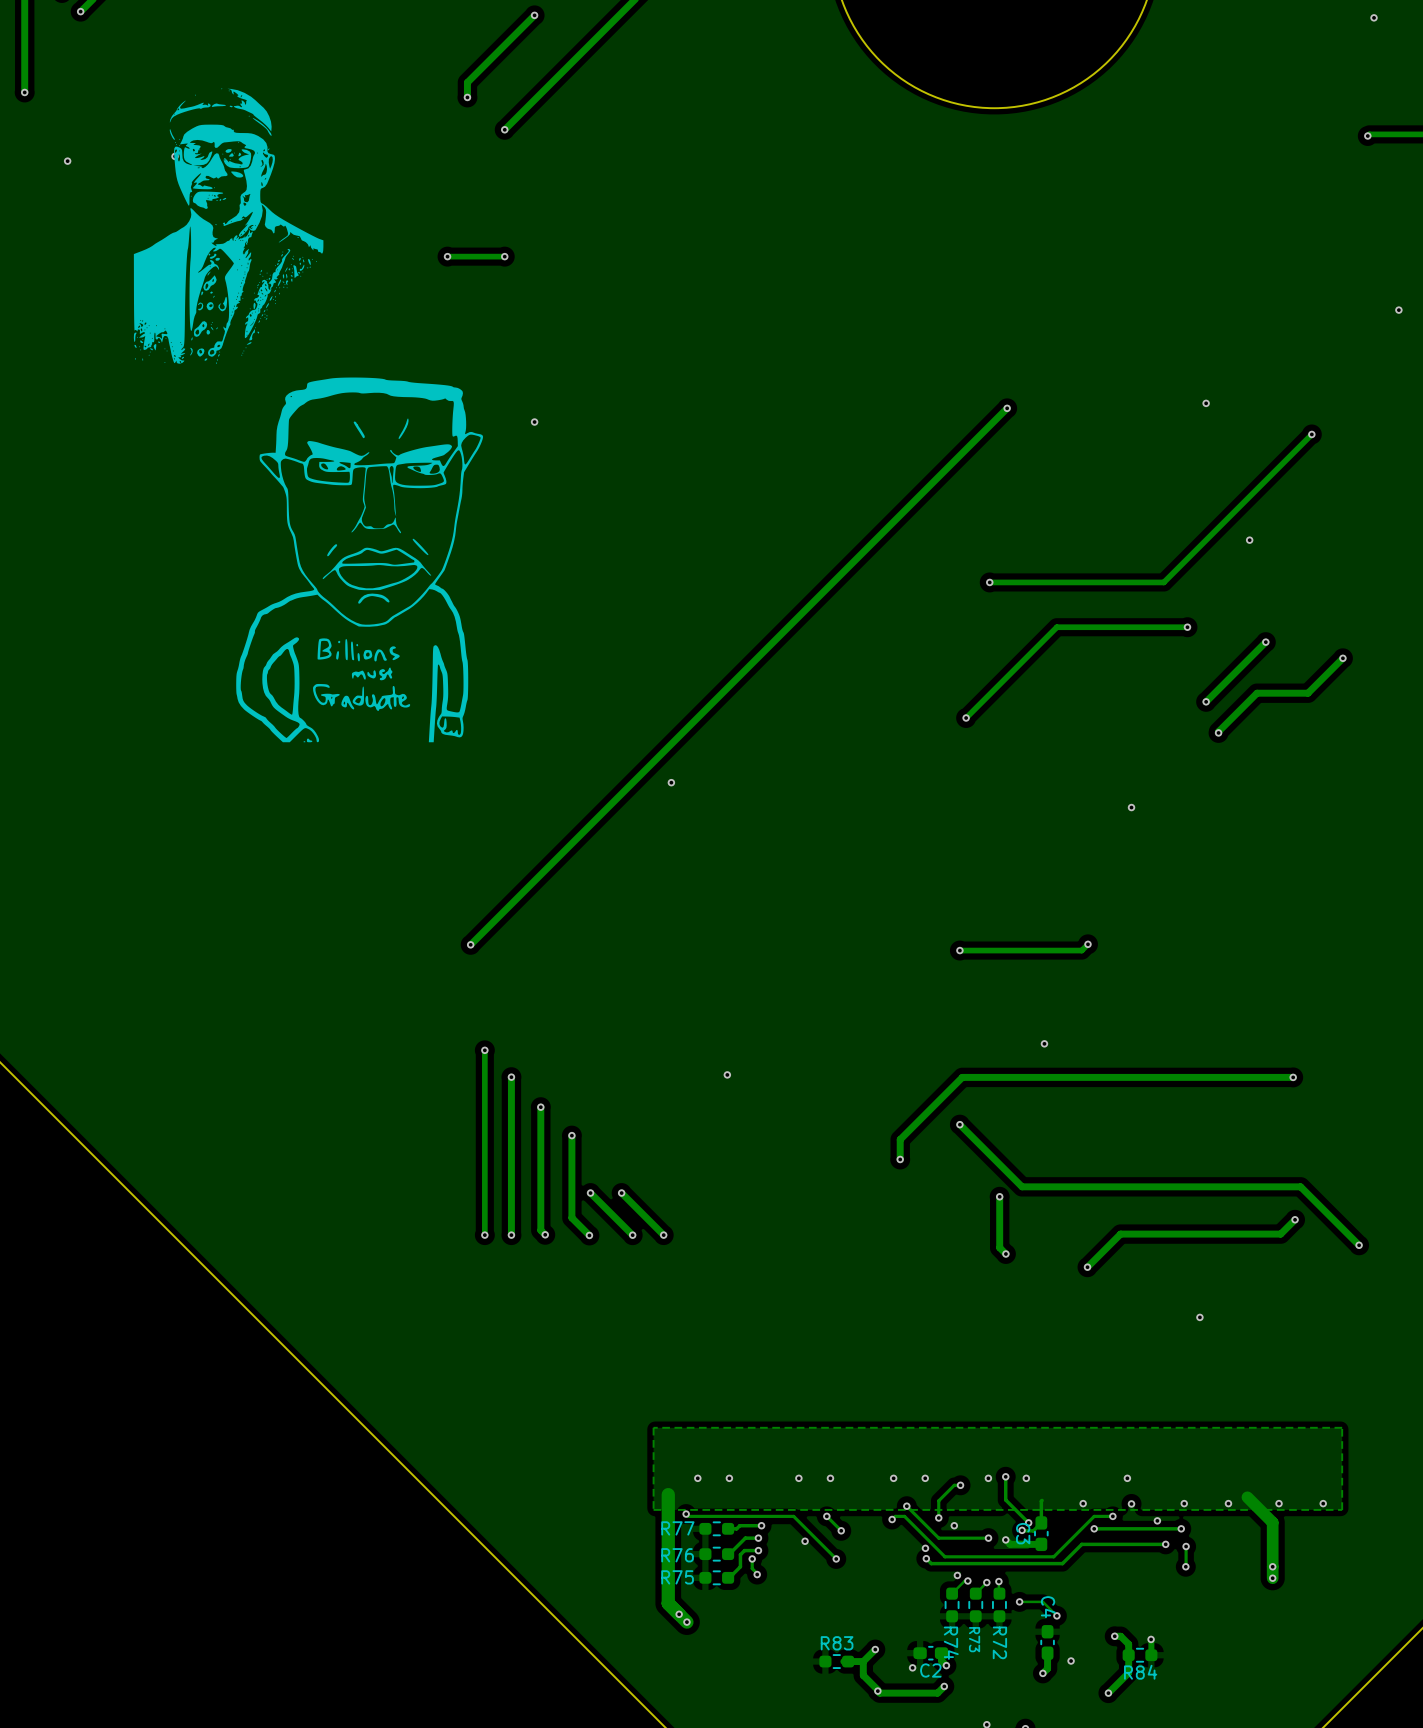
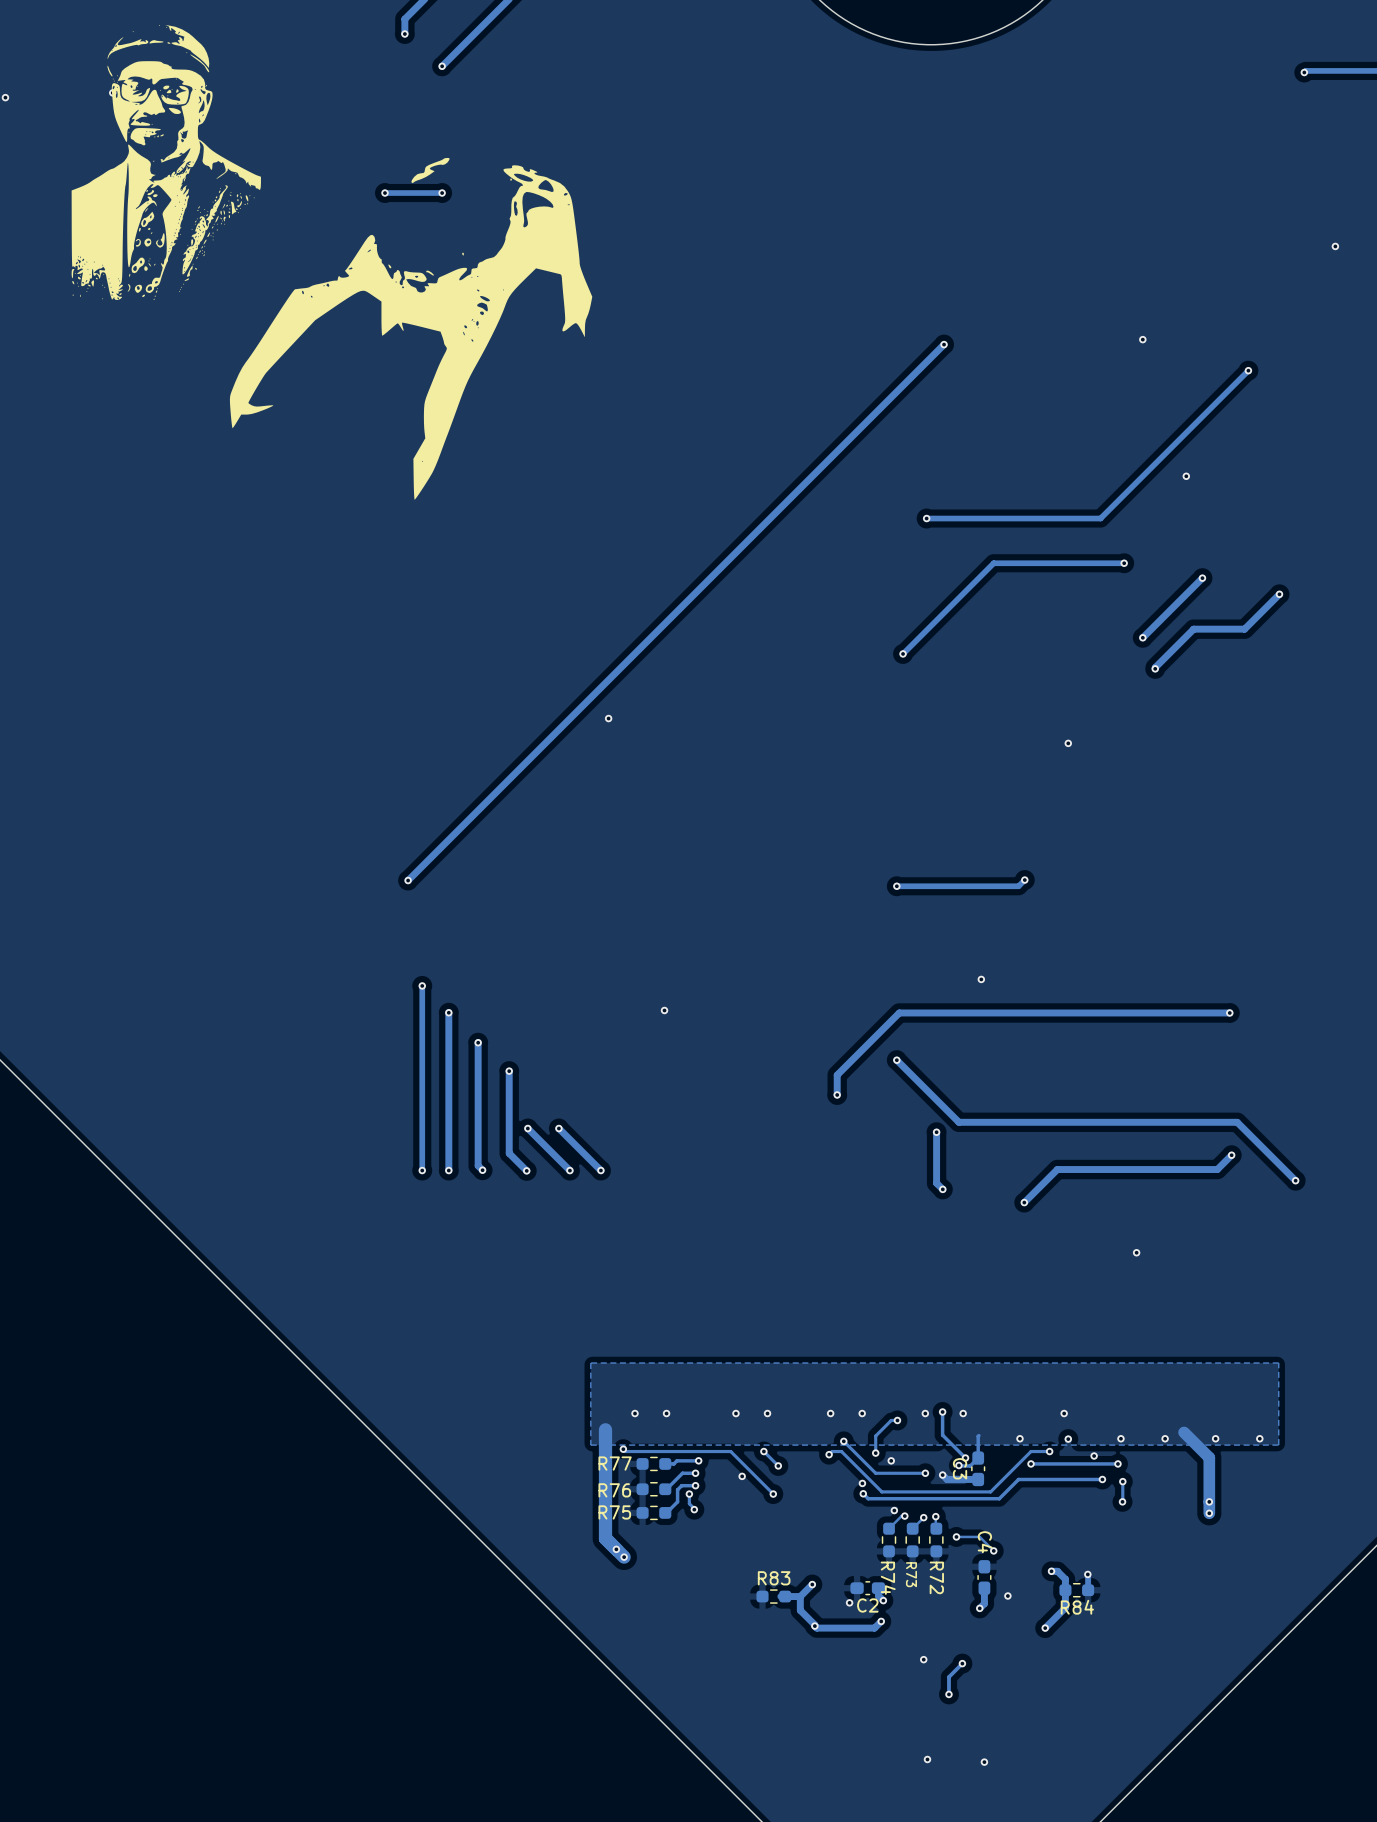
drawing: none -> [229, 157, 593, 500]
drawing: [236, 377, 484, 743] -> none

